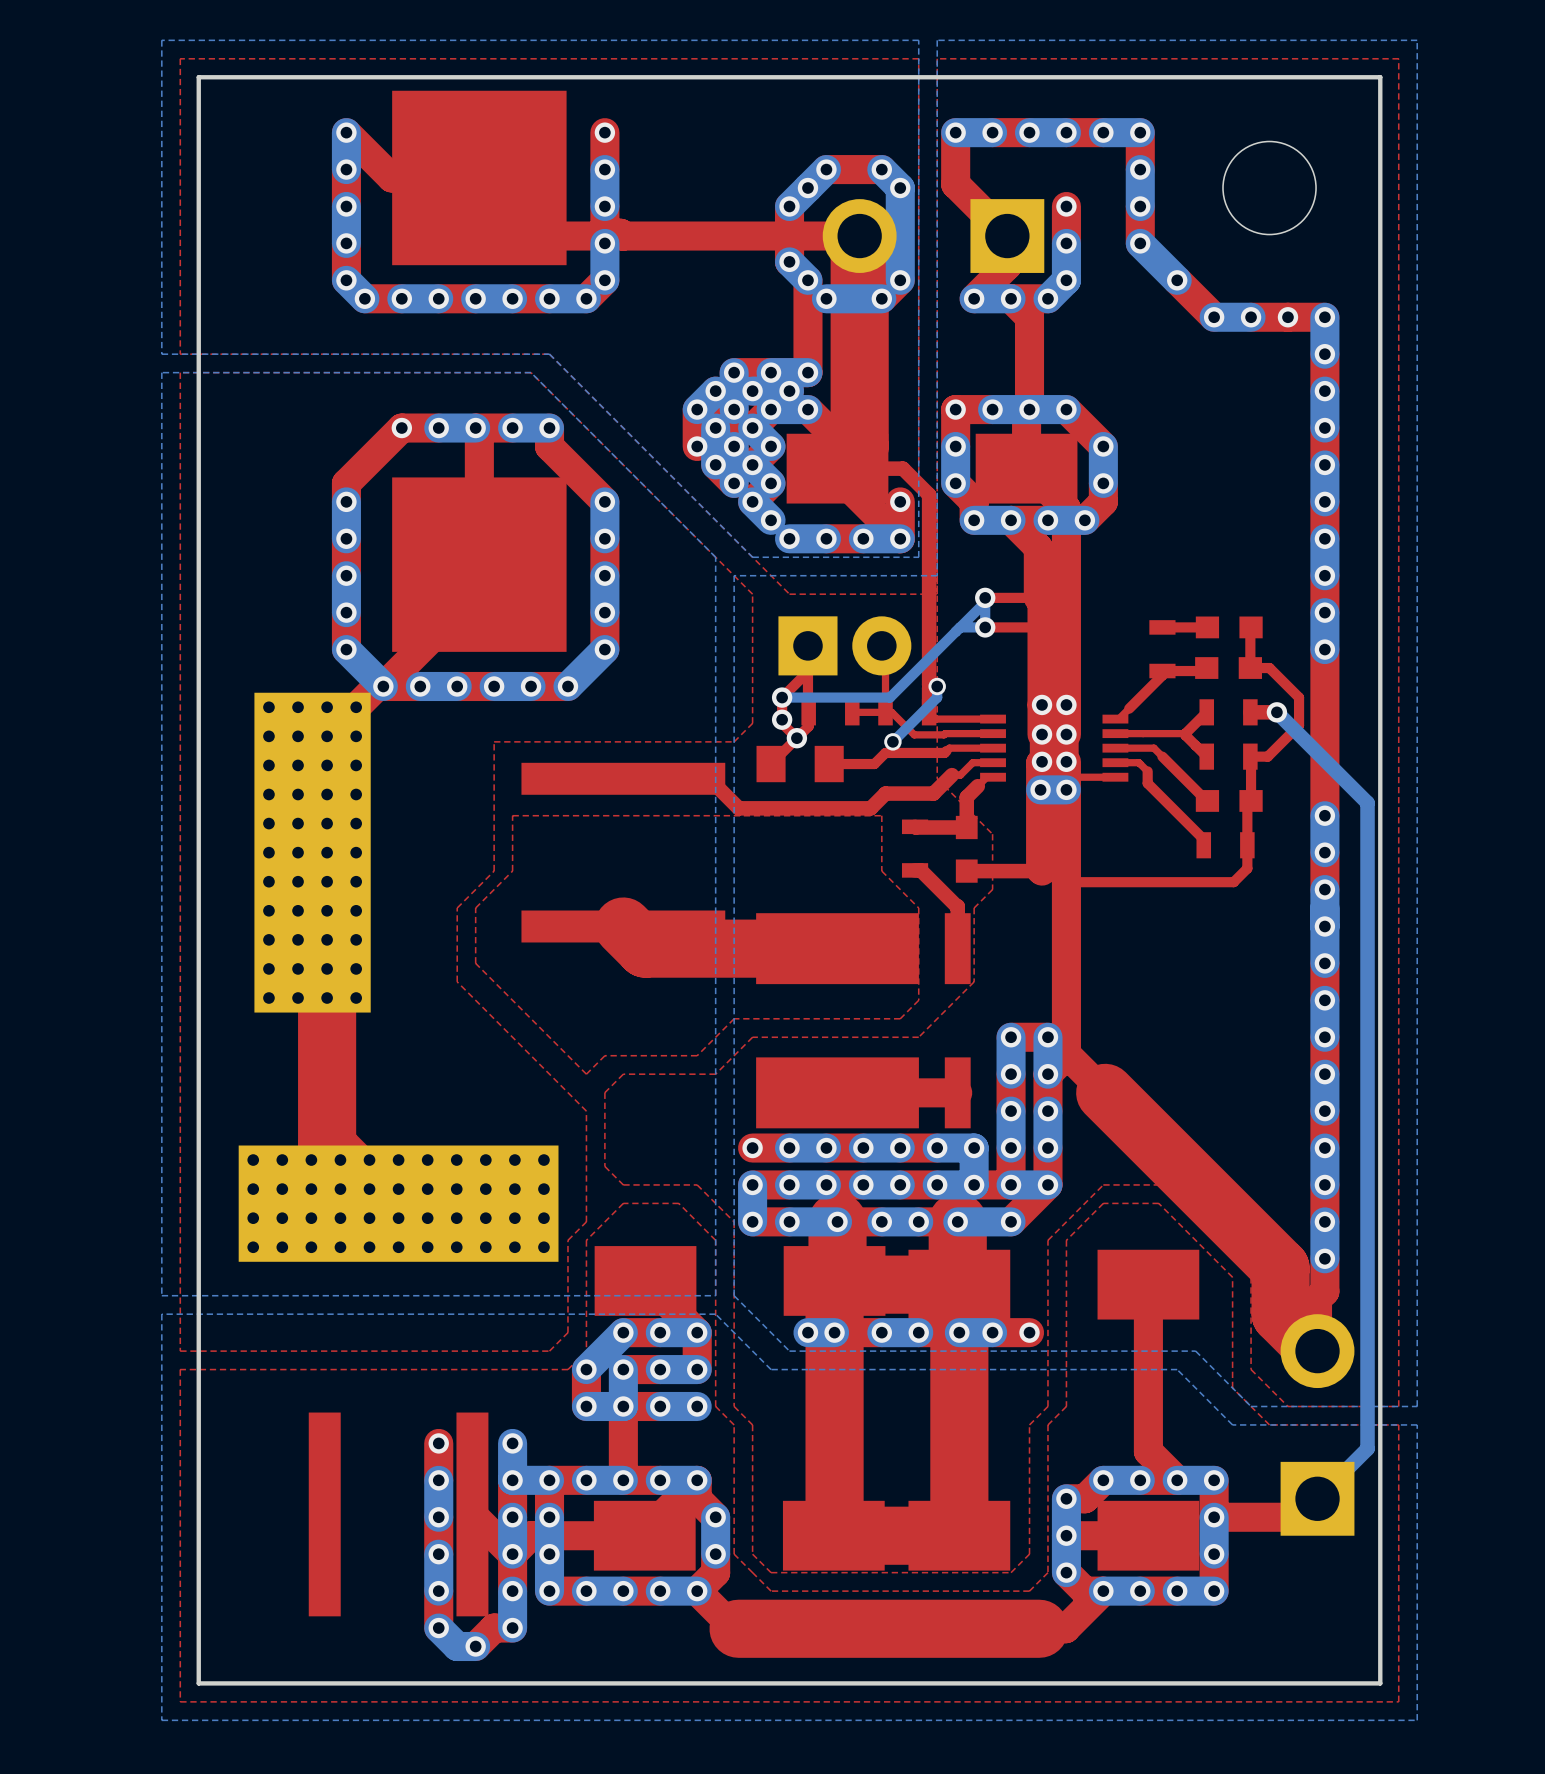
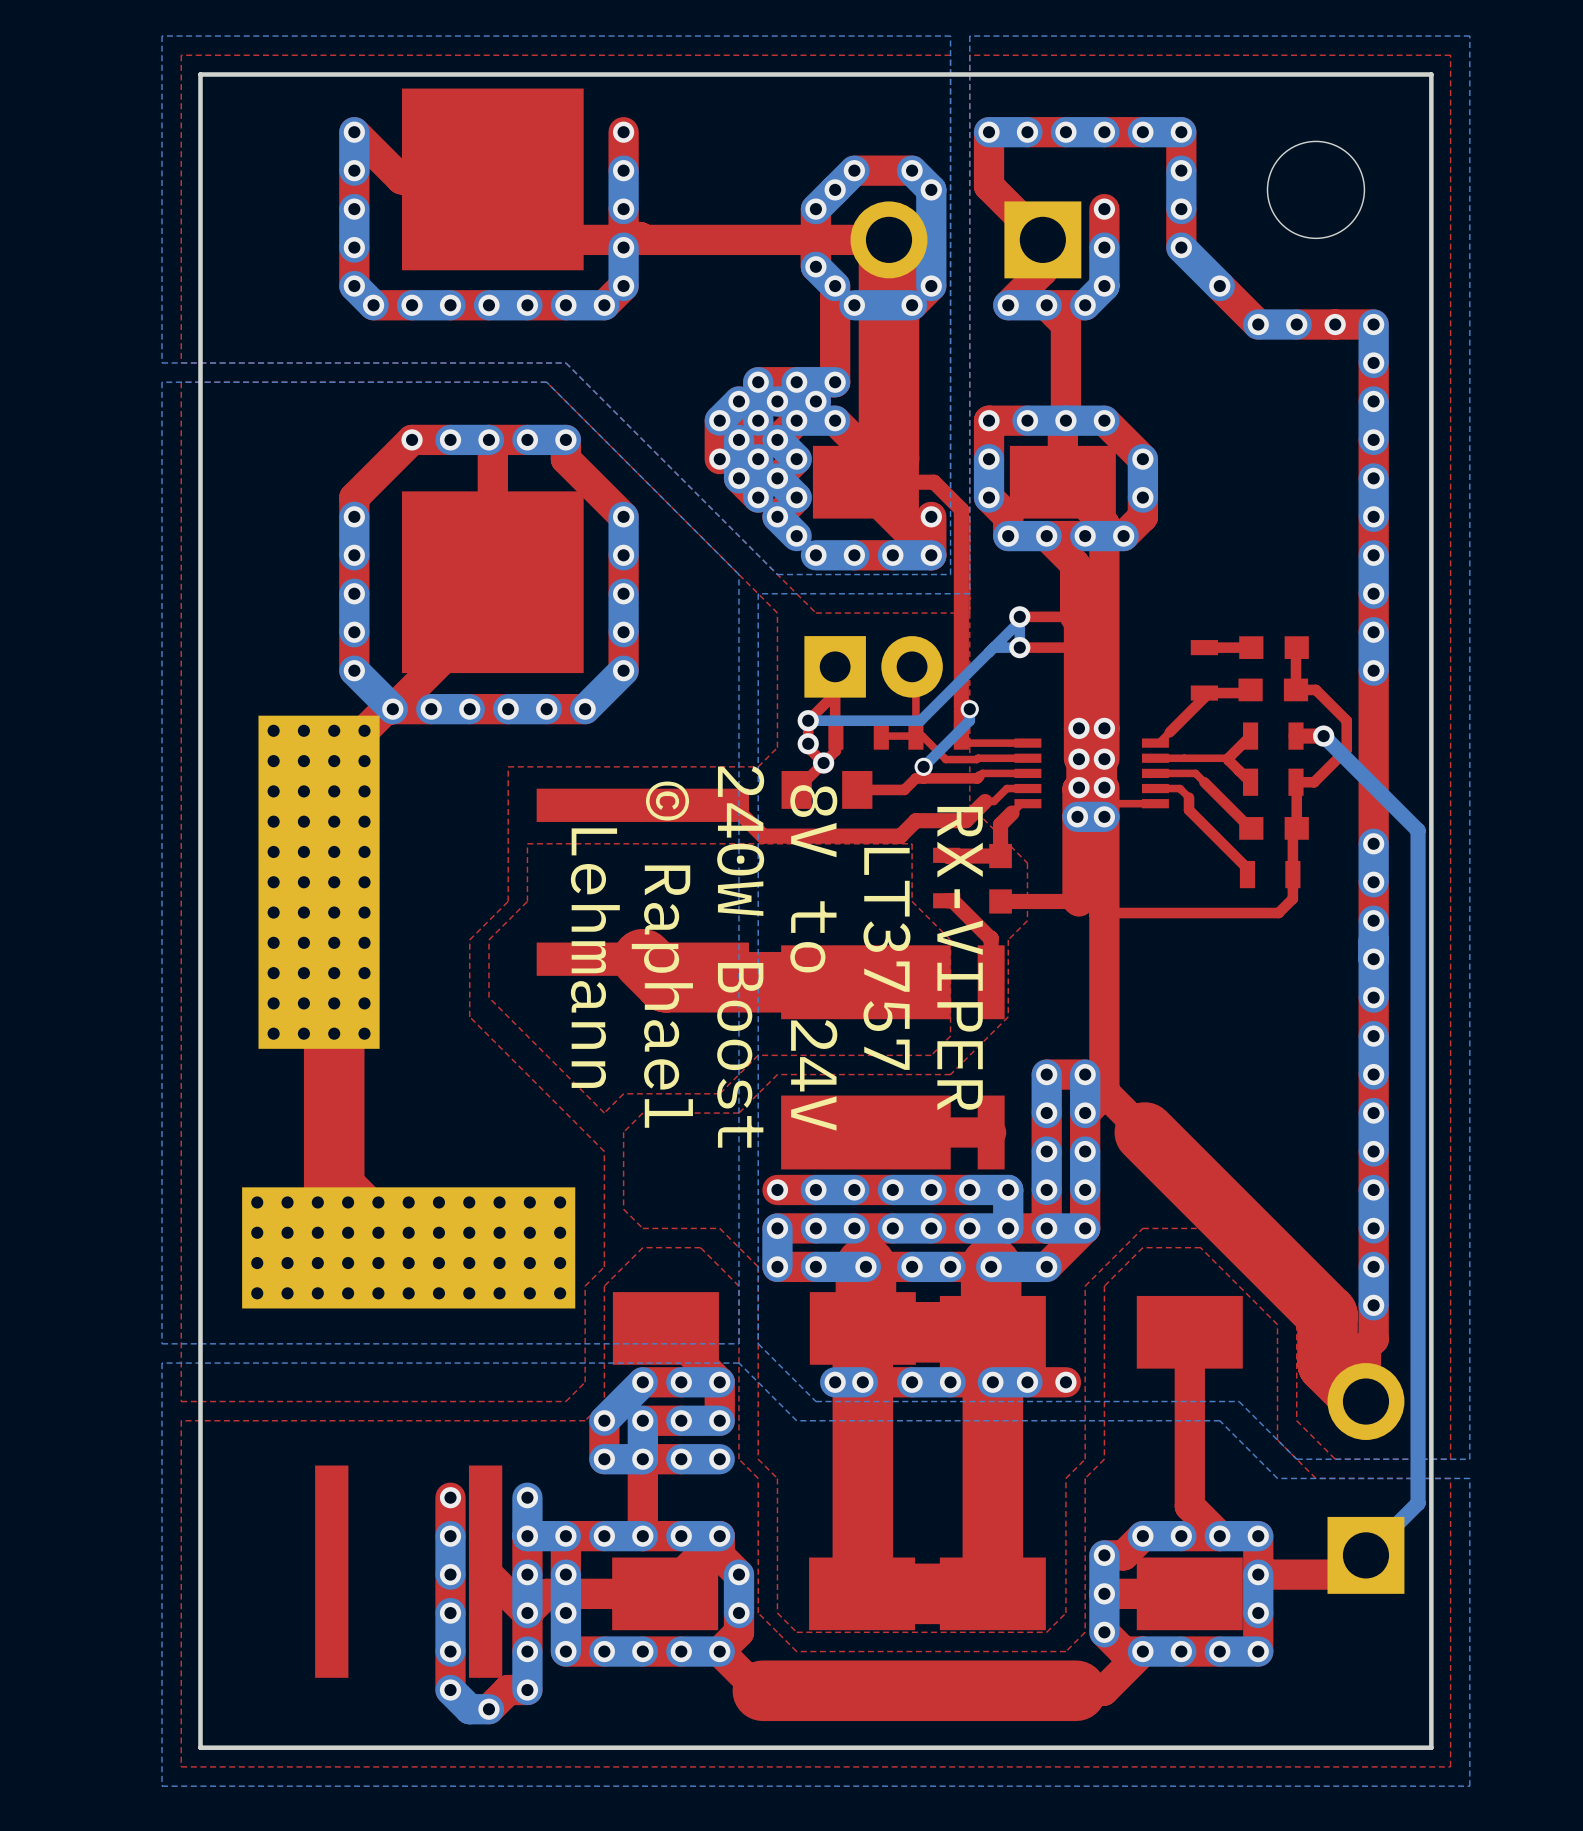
text: none -> © Raphael (662, 954)
text: none -> 240W Boost (740, 956)
text: none -> Lehmann (595, 958)
text: none -> 8V to 24V (813, 957)
text: none -> RX-VIPER (960, 958)
text: none -> LT3757 (886, 958)

